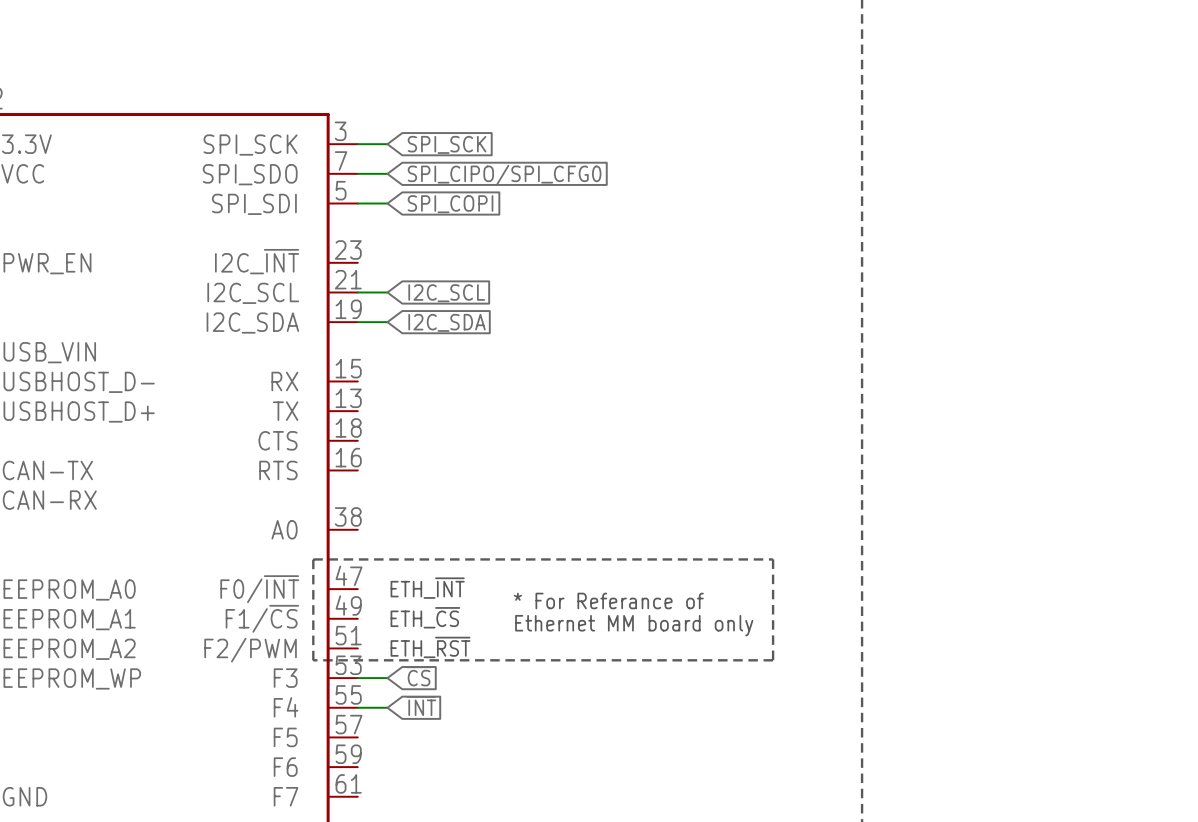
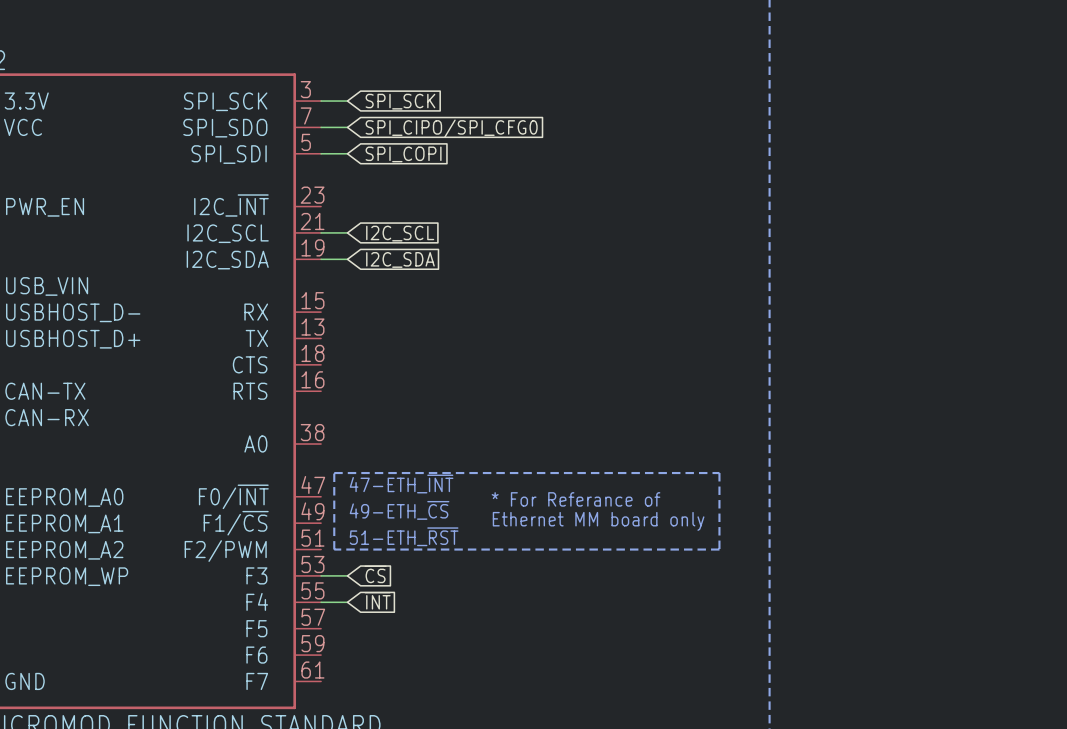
line: (313, 559) (313, 660) (773, 660) (773, 559) (313, 559) -> (334, 473) (334, 549) (719, 549) (719, 473) (334, 473)
text: ETH_~{INT} (427, 588) -> 47-ETH_~{INT} (401, 484)
text position: * For Referance of (608, 600) -> * For Referance of (575, 499)
text: ETH_~{CS} (425, 617) -> 49-ETH_~{CS} (399, 510)
text position: Ethernet MM board only (634, 625) -> Ethernet MM board only (598, 521)
text: ETH_~{RST} (430, 647) -> 51-ETH_~{RST} (404, 536)

